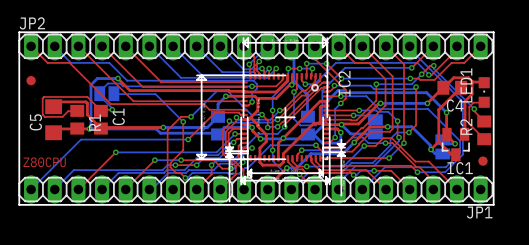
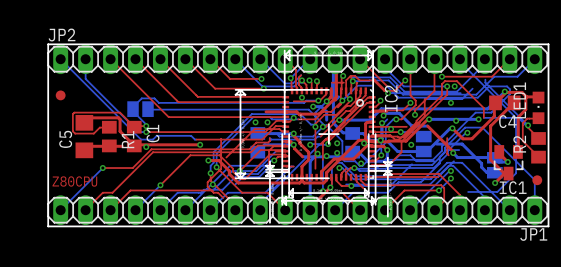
top track: (31, 46) (47, 62) (69, 62) (110, 104) (203, 104) (209, 109) (235, 109) -> (196, 139) (262, 139) (275, 126)
bottom track: none -> (60, 59) (141, 139) (152, 139) (156, 135) (191, 135) (196, 139)
bottom track: (54, 46) (71, 62) (109, 62) (127, 80) (253, 80) (257, 84) (257, 88) (252, 93) (252, 101) -> (85, 59) (85, 78) (138, 132) (146, 132)
top track: none -> (185, 59) (215, 88) (263, 88)
bottom track: (149, 46) (181, 77) (267, 77) (276, 68) -> none
top track: none -> (210, 59) (230, 78) (261, 78)
bottom track: (173, 46) (201, 74) (262, 74) (269, 68) -> none
top track: none -> (335, 59) (336, 90)
bottom track: (291, 46) (293, 48) (293, 81) (307, 94) (307, 116) -> (335, 59) (333, 60) (333, 123) (343, 132) (363, 133) (370, 140) (382, 138) (382, 123)
top track: (315, 46) (315, 59) (345, 89) (345, 98) (340, 103) -> (360, 59) (386, 85)
top track: (338, 46) (355, 62) (369, 62) (385, 79) (385, 105) (342, 147) (326, 147) -> none
bottom track: none -> (385, 59) (385, 67) (403, 86) (447, 86)
top track: (362, 46) (392, 76) -> (410, 59) (410, 95) (415, 100) (415, 105) (401, 119) (396, 119)
top track: (386, 46) (404, 64) (404, 143) -> (434, 59) (434, 90) (415, 110) (415, 114)
top track: (433, 46) (411, 67) -> none
bottom track: none -> (484, 59) (484, 63) (456, 91) (404, 91) (390, 77) (372, 77)
top track: (456, 46) (456, 50) (431, 74) (428, 74) -> (509, 59) (492, 76) (441, 76)
top track: (480, 46) (464, 62) (451, 62) (434, 79) (410, 78) -> none
bottom track: none -> (534, 59) (517, 76) (494, 76) (476, 94) (403, 94) (388, 80) (352, 81)
via: (259, 61) -> none
top track: none -> (343, 75) (341, 89)
via: none -> (343, 75)
via: none -> (441, 76)
via: (306, 63) -> none
via: (326, 63) -> none
via: none -> (261, 78)
top track: (433, 65) (430, 65) (421, 74) -> none
via: (433, 65) -> none
via: none -> (301, 80)
via: none -> (309, 80)
top track: none -> (405, 80) (394, 90) (384, 90) (373, 80) (359, 80) (355, 75) (350, 75) (346, 80) (346, 89)
via: none -> (405, 80)
via: none -> (316, 81)
via: none -> (352, 81)
bottom track: (411, 67) (345, 67) (322, 90) (322, 118) (315, 125) (300, 125) (293, 118) (293, 92) -> none
via: (411, 67) -> none
via: (262, 68) -> none
via: (269, 68) -> none
via: (276, 68) -> none
via: (288, 68) -> none
bottom track: (299, 68) (312, 68) -> none
via: (299, 68) -> none
via: (312, 68) -> none
bottom track: none -> (371, 85) (357, 85) (342, 100)
bottom track: none -> (386, 85) (398, 97) (477, 97) (489, 86) (507, 86) (510, 89) (510, 93) (491, 112) (475, 112) (441, 146) (441, 150) (432, 159) (386, 159)
top track: none -> (447, 86) (447, 94) (401, 141) (401, 152) (388, 165) (372, 164)
via: none -> (447, 86)
via: none -> (454, 86)
via: none -> (263, 88)
via: (421, 74) -> none
bottom track: (428, 74) (417, 62) (335, 62) (314, 84) (305, 84) -> none
via: (428, 74) -> none
top track: none -> (355, 89) (355, 108) (344, 119) (344, 122) (322, 142) (322, 159)
top track: none -> (441, 90) (441, 84) (444, 81) (456, 81) (483, 108) (483, 117)
via: none -> (504, 91)
top track: (117, 78) (130, 90) (276, 92) (287, 80) -> (326, 101) (331, 95)
bottom track: (117, 78) (97, 78) (90, 84) (89, 128) (156, 128) (160, 133) (218, 134) -> none
via: (117, 78) -> none
via: (410, 78) -> none
top track: (392, 80) (392, 128) (389, 131) (371, 131) (352, 151) (322, 151) (315, 145) -> (441, 95) (399, 139) (394, 139) (390, 135) (372, 135)
via: none -> (301, 97)
via: (291, 84) -> none
via: (376, 84) -> none
via: none -> (318, 100)
top track: none -> (342, 100) (331, 111) (322, 111) (315, 119) (298, 119)
via: none -> (342, 100)
bottom track: (334, 85) (370, 85) (374, 89) (413, 89) (416, 87) -> none
bottom track: (122, 86) (252, 86) -> (157, 101) (304, 102) (306, 100) (318, 100)
via: (252, 86) -> none
via: none -> (326, 101)
top track: none -> (349, 101) (336, 114) (324, 114) (314, 124)
top track: none -> (410, 102) (403, 110) (372, 110)
via: none -> (410, 102)
via: none -> (450, 102)
top track: (416, 87) (416, 125) (408, 132) -> none
via: (416, 87) -> none
top track: (442, 88) (427, 103) -> (494, 103) (494, 116) (471, 138) (462, 138) (452, 128)
bottom track: none -> (313, 106) (321, 106) (326, 111) (326, 120)
via: none -> (313, 106)
via: (293, 92) -> none
bottom track: (335, 93) (337, 90) (345, 92) (426, 92) (446, 112) -> (381, 108) (487, 108) (504, 91)
bottom track: (155, 94) (183, 121) -> (191, 109) (308, 109) (342, 141) (342, 159) (344, 161) (355, 161) (359, 165) (362, 165) (385, 142) (385, 126) (393, 119) (396, 119)
bottom track: (225, 96) (218, 104) (218, 116) (207, 127) (163, 127) -> none
via: (225, 96) -> none
bottom track: (340, 96) (366, 96) (379, 109) (428, 109) (460, 140) (460, 153) (445, 167) (384, 167) -> (450, 171) (433, 186)
via: (340, 96) -> none
top track: (257, 99) (257, 110) (248, 119) (244, 119) -> none
bottom track: none -> (383, 115) (385, 113) (399, 113) (412, 126) (427, 126)
via: none -> (383, 115)
via: none -> (415, 114)
top track: (326, 101) (320, 101) (278, 143) (278, 153) -> (372, 145) (367, 145) (353, 159) (334, 159) (321, 171)
bottom track: none -> (483, 117) (518, 117) (528, 127)
bottom track: (325, 102) (325, 122) (314, 133) (307, 134) -> (371, 118) (339, 120)
bottom track: none -> (298, 119) (253, 117) (216, 153) (216, 167)
via: (340, 103) -> none
via: none -> (396, 119)
top track: none -> (285, 120) (276, 120) (265, 132) (146, 132)
via: none -> (339, 120)
via: none -> (456, 120)
via: none -> (255, 122)
via: none -> (267, 122)
via: none -> (382, 123)
bottom track: none -> (314, 124) (310, 124) (300, 114) (251, 114) (213, 152) (210, 173)
top track: none -> (427, 126) (453, 153)
bottom track: (359, 110) (388, 111) (397, 121) -> none
via: (359, 110) -> none
bottom track: none -> (452, 128) (450, 128) (427, 150) (423, 151)
via: none -> (452, 128)
via: none -> (391, 129)
top track: (446, 112) (446, 134) -> none
via: (446, 112) -> none
top track: (262, 114) (267, 120) (267, 127) -> none
bottom track: (262, 114) (251, 114) (227, 91) (216, 91) (191, 116) -> none
via: (262, 114) -> none
via: none -> (146, 132)
top track: (191, 116) (181, 116) (167, 130) (167, 184) (173, 189) -> none
via: (191, 116) -> none
bottom track: none -> (257, 133) (293, 133)
via: none -> (293, 133)
bottom track: none -> (467, 132) (447, 150) (447, 153) (433, 168) (390, 168) (387, 171) (381, 171)
via: none -> (467, 132)
top track: (236, 117) (236, 121) (225, 131) (225, 152) (243, 170) (243, 189) -> (216, 167) (242, 192) (267, 192) (284, 209)
via: (236, 117) -> none
via: (277, 119) -> none
via: (183, 121) -> none
via: (229, 121) -> none
via: (397, 121) -> none
via: none -> (380, 140)
via: (341, 124) -> none
top track: (227, 125) (222, 130) (222, 153) (235, 166) (235, 174) (220, 189) -> (268, 142) (256, 142) (249, 149) (151, 149) (132, 168) (102, 168)
via: (277, 126) -> none
bottom track: (284, 126) (277, 133) (258, 133) (232, 160) (215, 160) (211, 165) -> none
via: none -> (337, 143)
via: none -> (364, 143)
top track: (387, 126) (369, 126) (354, 142) -> none
via: (387, 126) -> none
top track: none -> (285, 145) (257, 145) (251, 152) (152, 152) (112, 192) (102, 192) (85, 210)
bottom track: none -> (328, 144) (319, 144) (260, 203) (260, 210)
via: none -> (411, 144)
via: (89, 128) -> none
via: none -> (146, 147)
top track: none -> (285, 150) (260, 150) (239, 171)
via: (408, 132) -> none
via: (235, 133) -> none
via: none -> (337, 153)
bottom track: none -> (453, 153) (457, 157) (494, 157)
via: none -> (453, 153)
bottom track: none -> (317, 153) (310, 161) (310, 210)
via: none -> (317, 153)
bottom track: (399, 137) (399, 140) (374, 165) (355, 165) (338, 182) (338, 189) -> none
via: (399, 137) -> none
via: (260, 138) -> none
bottom track: (188, 139) (81, 139) (71, 149) -> none
via: (188, 139) -> none
bottom track: none -> (322, 159) (322, 191)
top track: (438, 141) (430, 149) -> none
via: none -> (208, 160)
top track: (244, 142) (238, 145) (238, 158) (242, 162) -> none
bottom track: (354, 142) (342, 153) (311, 153) (296, 167) (286, 167) -> none
via: (354, 142) -> none
top track: (385, 143) (392, 143) (416, 167) (419, 167) (433, 180) (433, 189) -> none
via: (385, 143) -> none
via: (404, 143) -> none
bottom track: (315, 145) (270, 145) (247, 167) (245, 167) (239, 173) (225, 172) -> (275, 182) (265, 192)
top track: (364, 145) (375, 145) (383, 138) (391, 138) (415, 161) (428, 161) (456, 189) -> none
via: (364, 145) -> none
via: none -> (216, 167)
via: (252, 148) -> none
via: none -> (102, 168)
bottom track: none -> (339, 168) (342, 168) (353, 179) (430, 179) (447, 162) (462, 162) (509, 210)
via: none -> (339, 168)
top track: none -> (354, 168) (350, 168) (346, 172) (346, 176)
bottom track: none -> (354, 168) (359, 171) (373, 171) (379, 165) (432, 165) (444, 152) (444, 147) (465, 127) (482, 127) (534, 179) (534, 210)
via: none -> (354, 168)
via: (430, 149) -> none
bottom track: (272, 150) (272, 160) (284, 172) (299, 174) -> none
via: (272, 150) -> none
via: (301, 150) -> none
top track: (115, 152) (97, 170) -> (212, 190) (130, 190)
bottom track: (115, 152) (193, 152) -> (212, 190) (232, 171)
via: (115, 152) -> none
via: none -> (239, 171)
via: none -> (450, 171)
via: none -> (210, 173)
top track: none -> (508, 173) (504, 174) (495, 182)
bottom track: none -> (391, 174) (389, 176) (355, 176) (341, 162) (337, 162) (331, 168) (331, 184)
via: (389, 158) -> none
bottom track: none -> (450, 178) (438, 190)
via: none -> (450, 178)
top track: (154, 160) (125, 189) -> none
bottom track: (154, 160) (181, 160) -> none
via: (154, 160) -> none
top track: (181, 160) (201, 160) -> (160, 185) (190, 155) (219, 155) (240, 179)
via: (181, 160) -> none
top track: (205, 160) (213, 160) (222, 168) (230, 168) -> (245, 179) (269, 154) (285, 154)
top track: (283, 160) (280, 165) (262, 165) (259, 161) -> (326, 179) (323, 182) (304, 182) (301, 180) (299, 182) (238, 182) (218, 160) (208, 160)
via: (242, 162) -> none
top track: (288, 162) (295, 169) (302, 169) (306, 172) (351, 172) (353, 175) -> (331, 181) (331, 184)
bottom track: (234, 163) (220, 163) (213, 170) (188, 170) (186, 172) (168, 172) (149, 189) -> (269, 165) (230, 165) (185, 209)
via: none -> (495, 182)
via: none -> (160, 185)
top track: (175, 165) (196, 165) -> none
bottom track: (175, 165) (167, 165) (162, 170) (73, 170) (54, 189) -> none
via: (196, 165) -> none
top track: (211, 165) (211, 174) (196, 189) -> (210, 173) (210, 180) (235, 205) (235, 209)
via: (211, 165) -> none
bottom track: none -> (346, 184) (429, 184) (448, 165) (453, 165) (484, 197) (484, 210)
top track: (391, 165) (411, 165) (417, 172) -> (441, 185) (444, 188) (444, 200) (434, 210)
via: (230, 168) -> none
top track: (318, 168) (366, 170) (386, 189) -> none
top track: none -> (422, 190) (404, 190) (385, 210)
bottom track: (374, 170) (360, 170) (353, 175) -> none
via: (374, 170) -> none
top track: (389, 170) (409, 189) -> (391, 174) (438, 174) (459, 194) (459, 209)
via: none -> (438, 190)
via: none -> (322, 191)
bottom track: (118, 172) (142, 172) -> (152, 192) (160, 185)
bottom track: none -> (177, 192) (160, 210)
bottom track: (192, 172) (185, 177) -> (230, 192) (227, 192) (210, 210)
via: (417, 172) -> none
via: (299, 174) -> none
via: (353, 175) -> none
via: (185, 177) -> none

